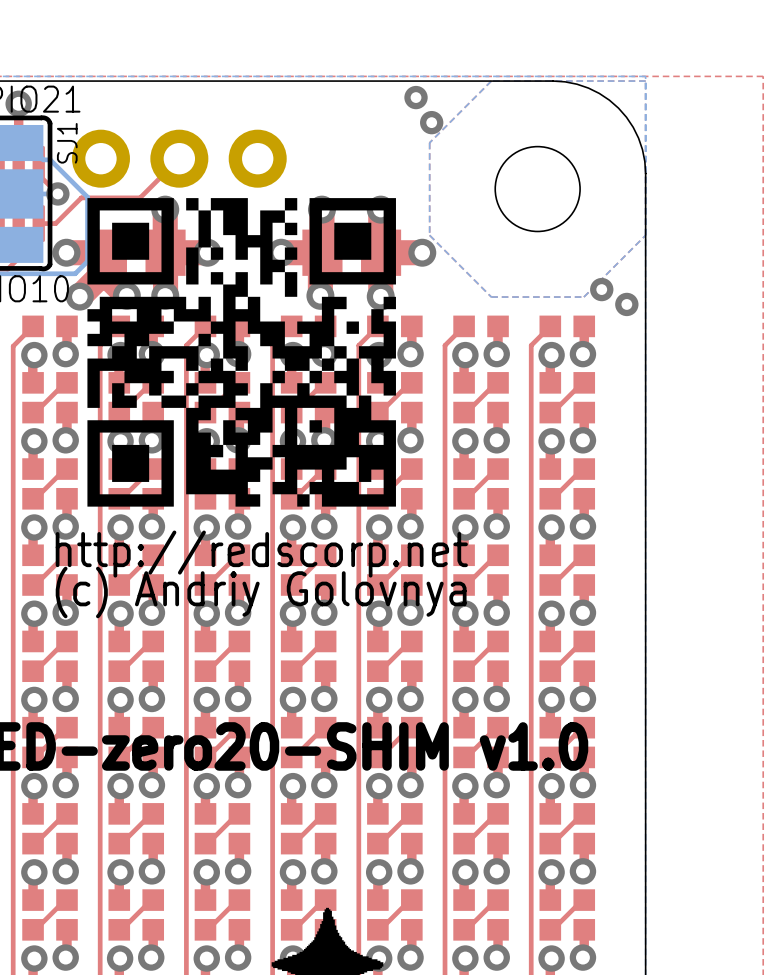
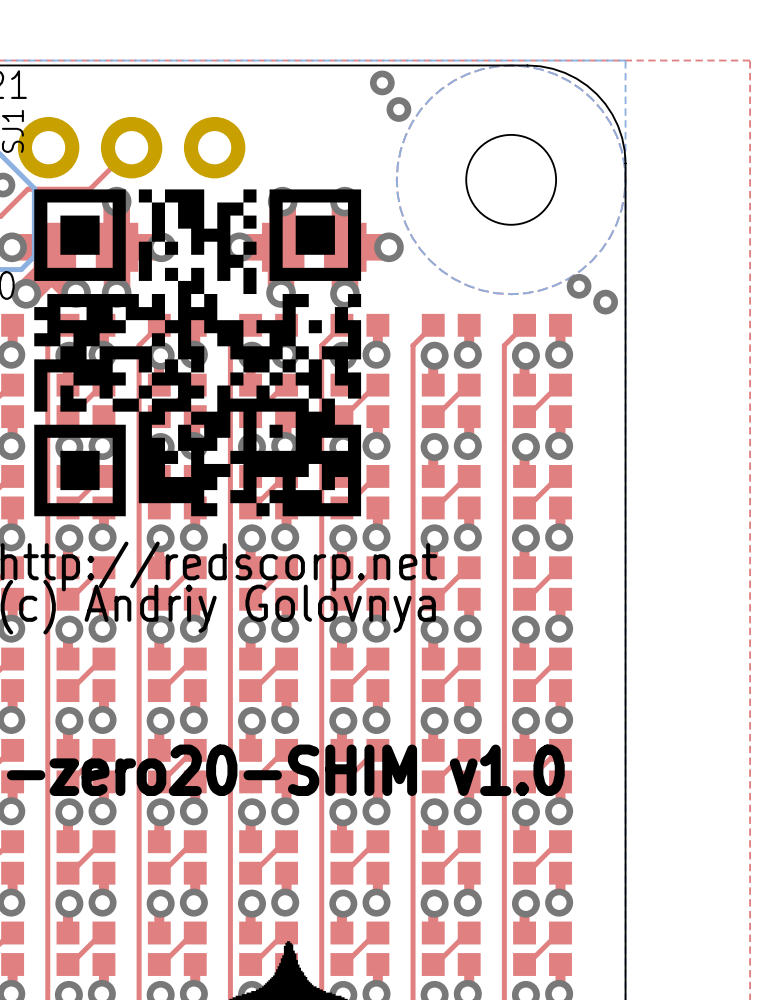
bottom zone outline: none -> (511, 65) (540, 69) (554, 74) (568, 80) (592, 98) (601, 110) (616, 136) (624, 164) (625, 179) (624, 194) (616, 223) (601, 249) (592, 260) (580, 270) (554, 285) (540, 290) (511, 294) (481, 290) (467, 285) (441, 270) (430, 260) (420, 249) (405, 223) (397, 194) (396, 179) (397, 164) (405, 136) (420, 110) (430, 98) (453, 80) (467, 74) (481, 69) (511, 65)
bottom zone outline: (645, 81) (491, 81) (429, 142) (429, 235) (491, 297) (583, 297) (645, 235) -> none

